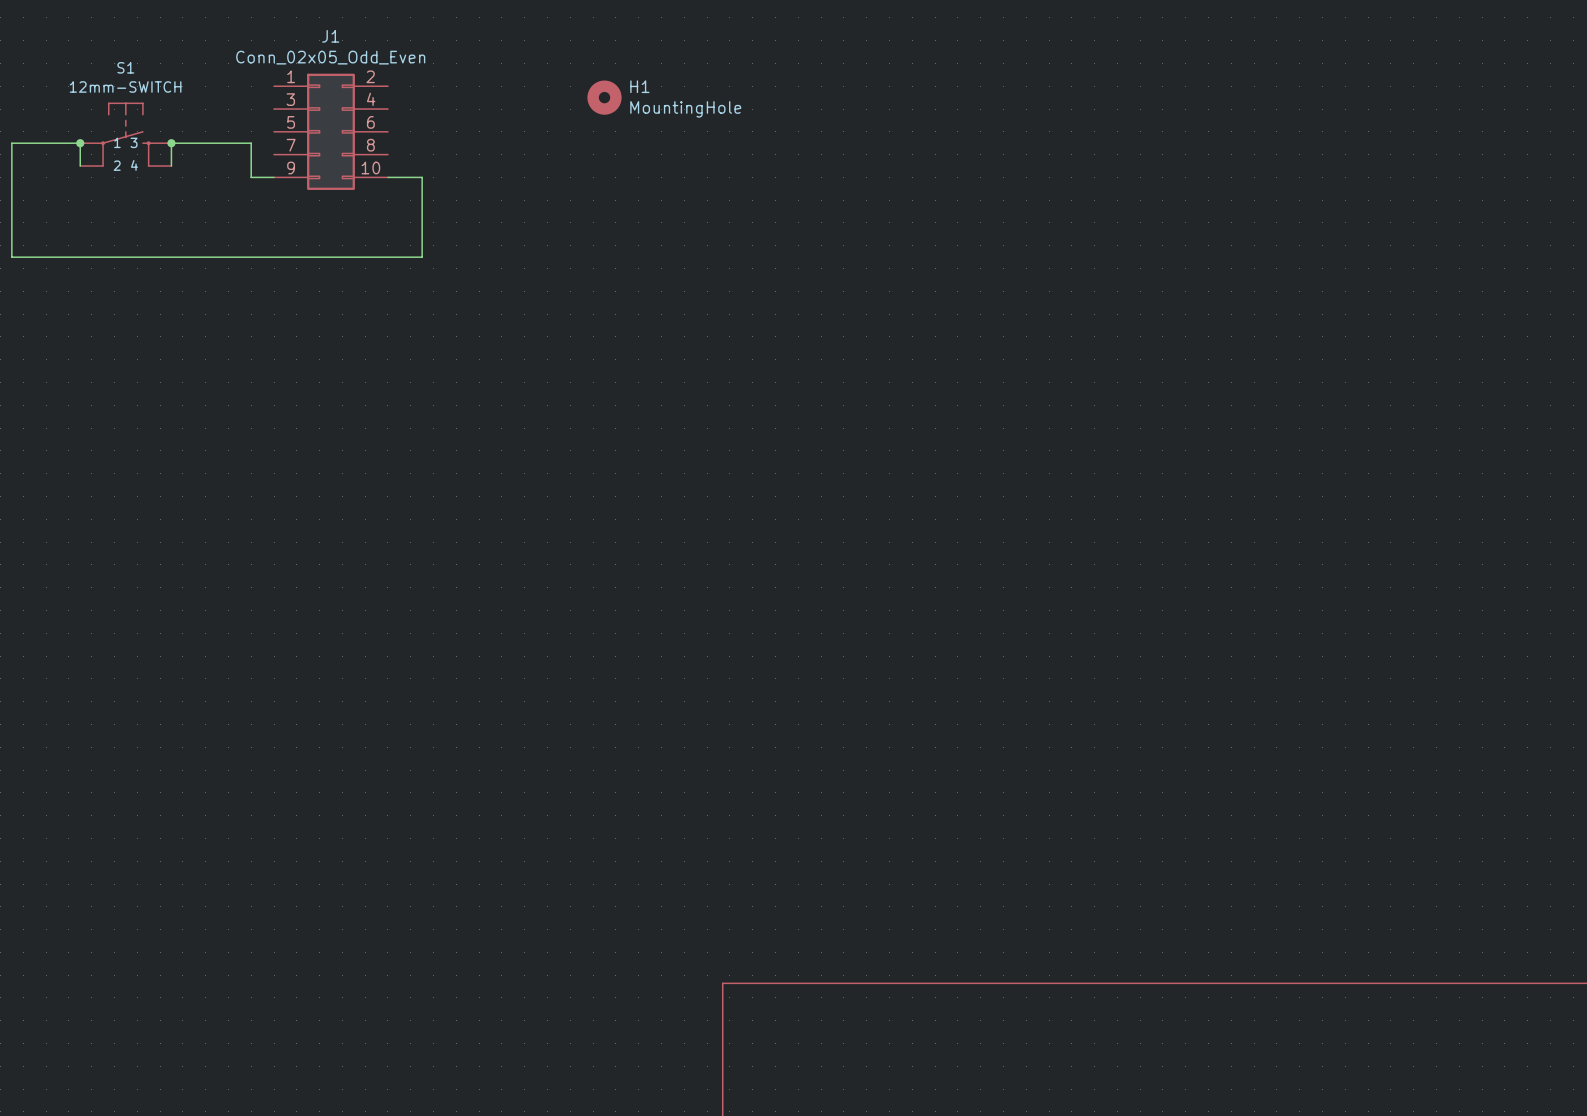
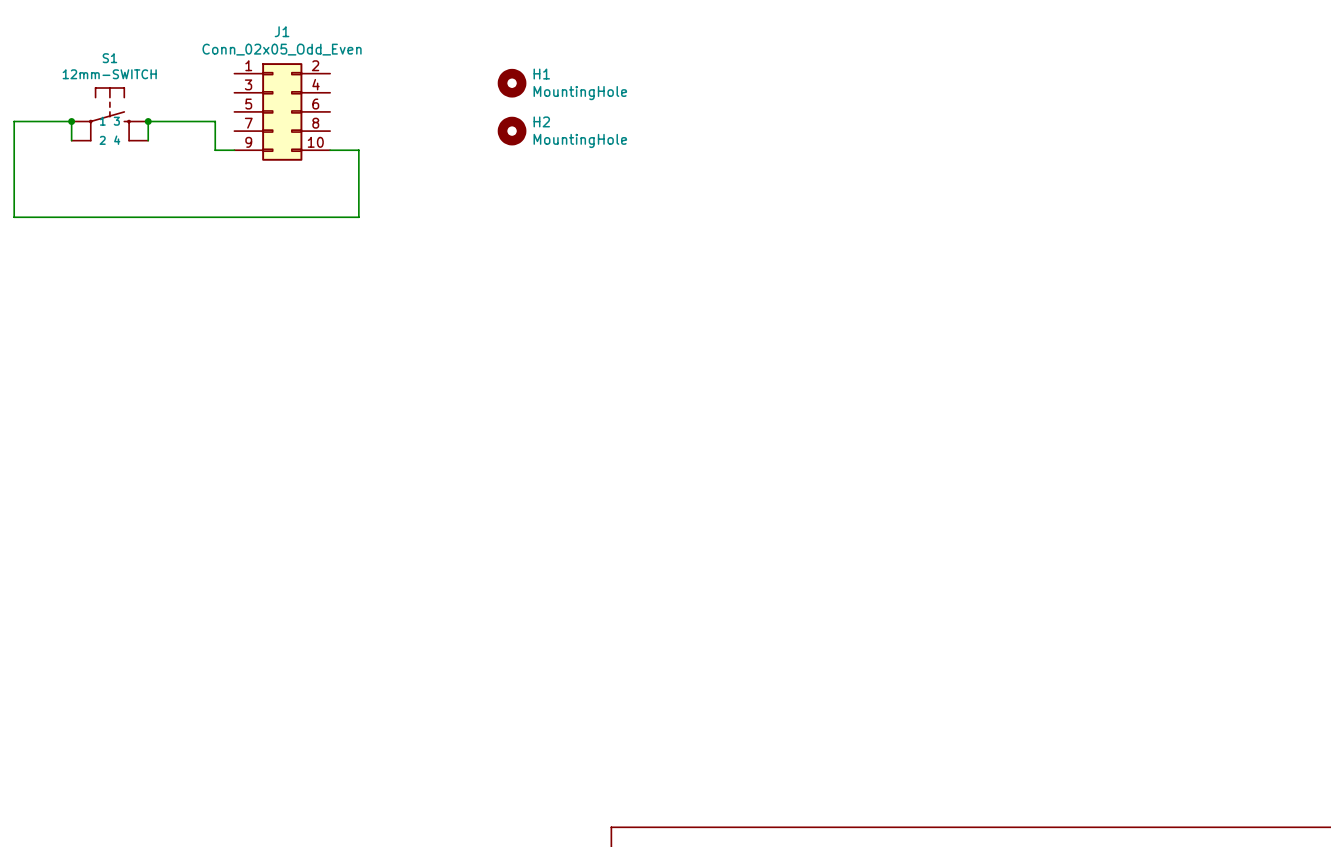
H2: none -> MountingHole (512, 131)

